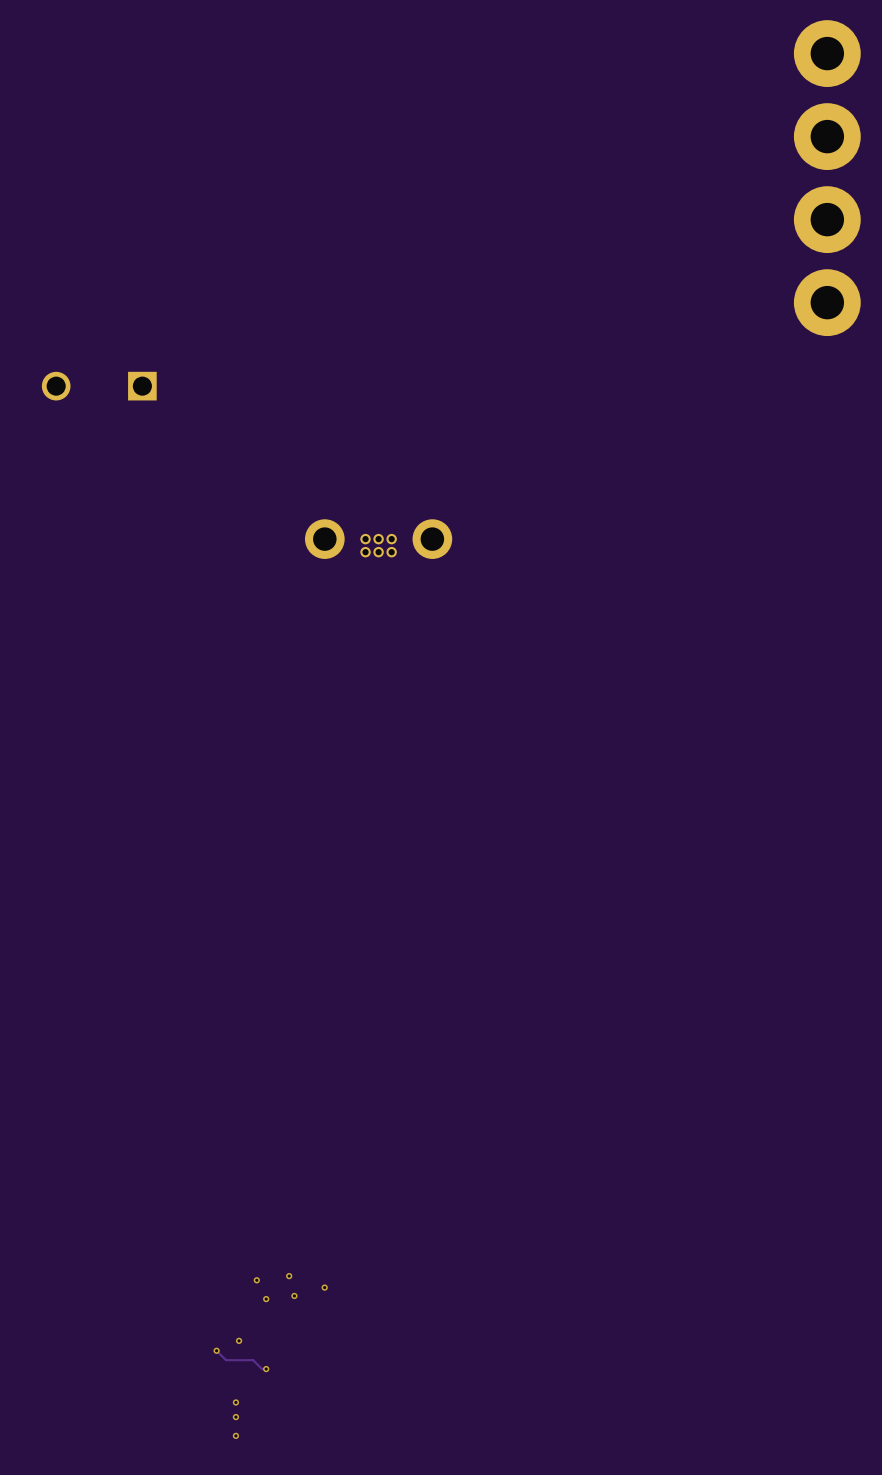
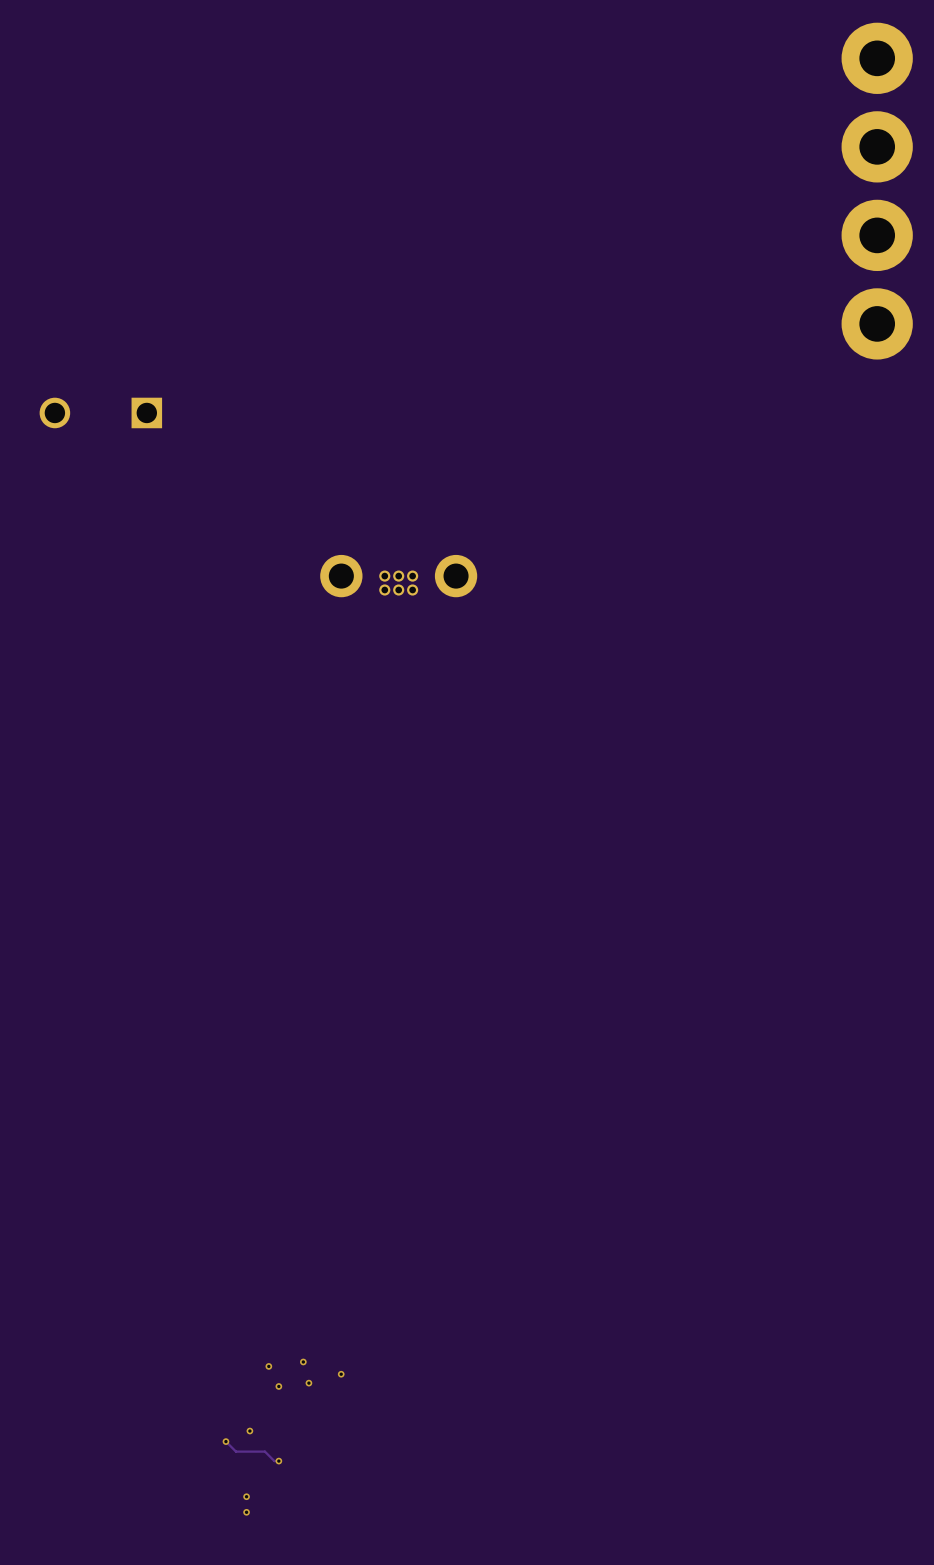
via: (235, 1435) -> none

